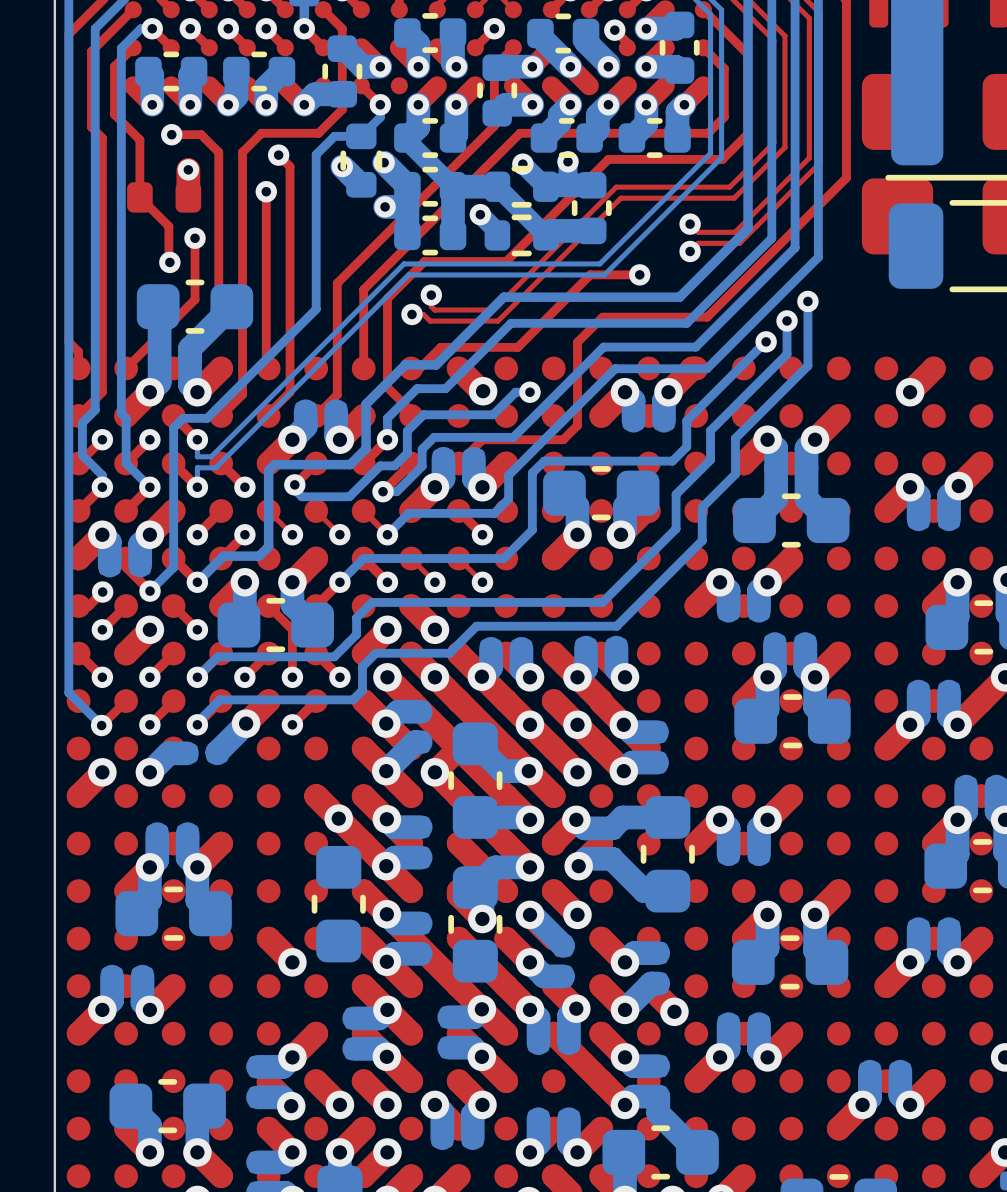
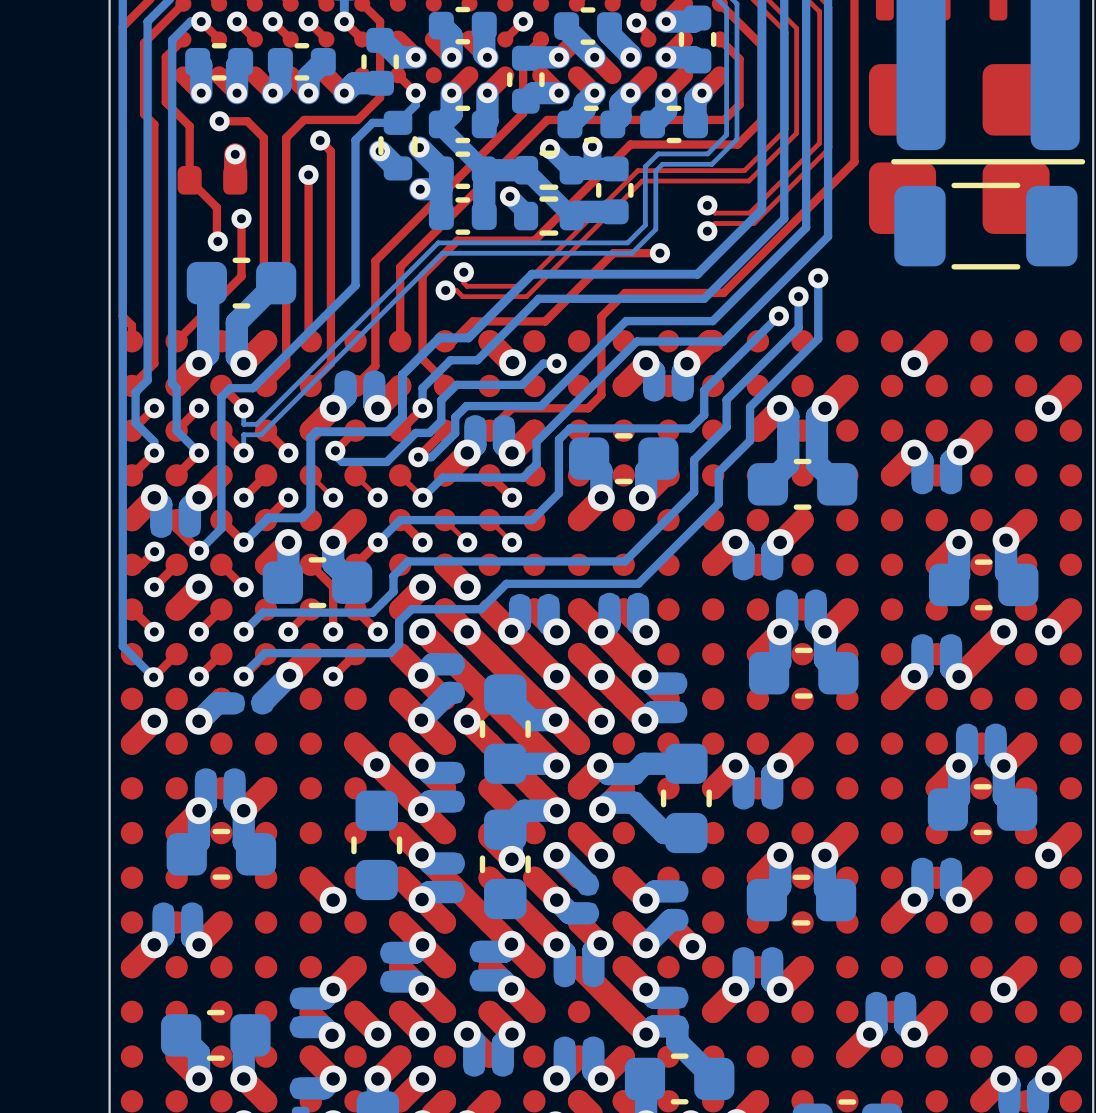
bottom track: (710, 149) (710, 153) (599, 263) -> (726, 134) (707, 153) (658, 153) (645, 166) (645, 225) (627, 242) (622, 242)
bottom track: (721, 153) (721, 157) (604, 274) -> (736, 139) (711, 164) (662, 164) (655, 171) (655, 229) (631, 253) (626, 253)

